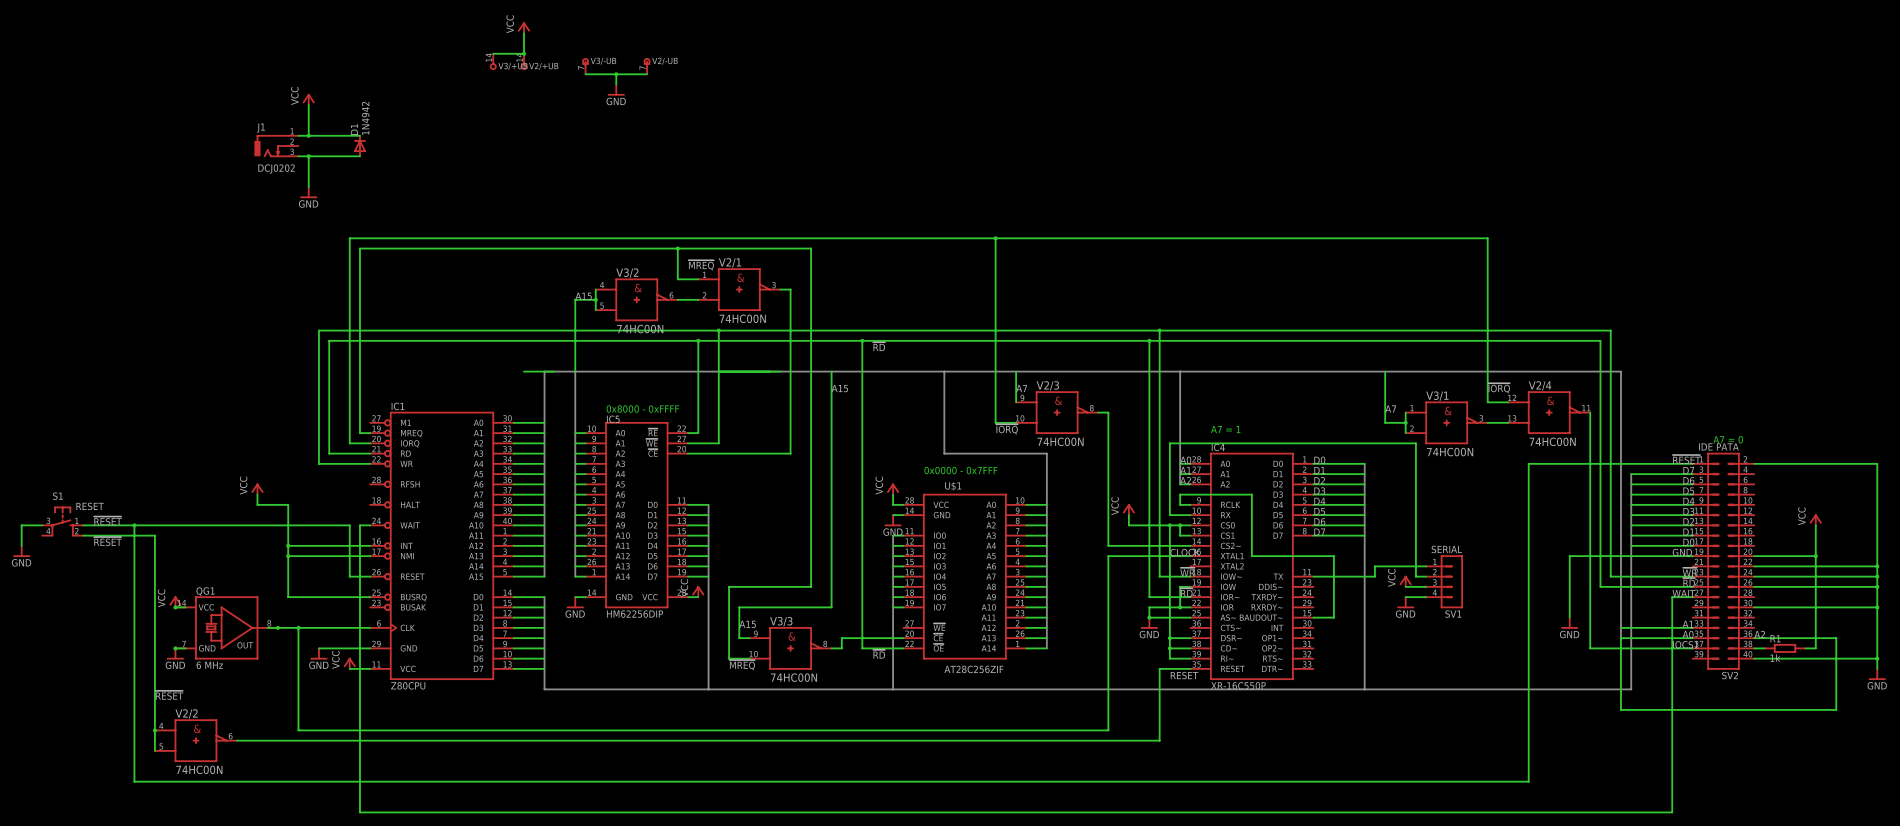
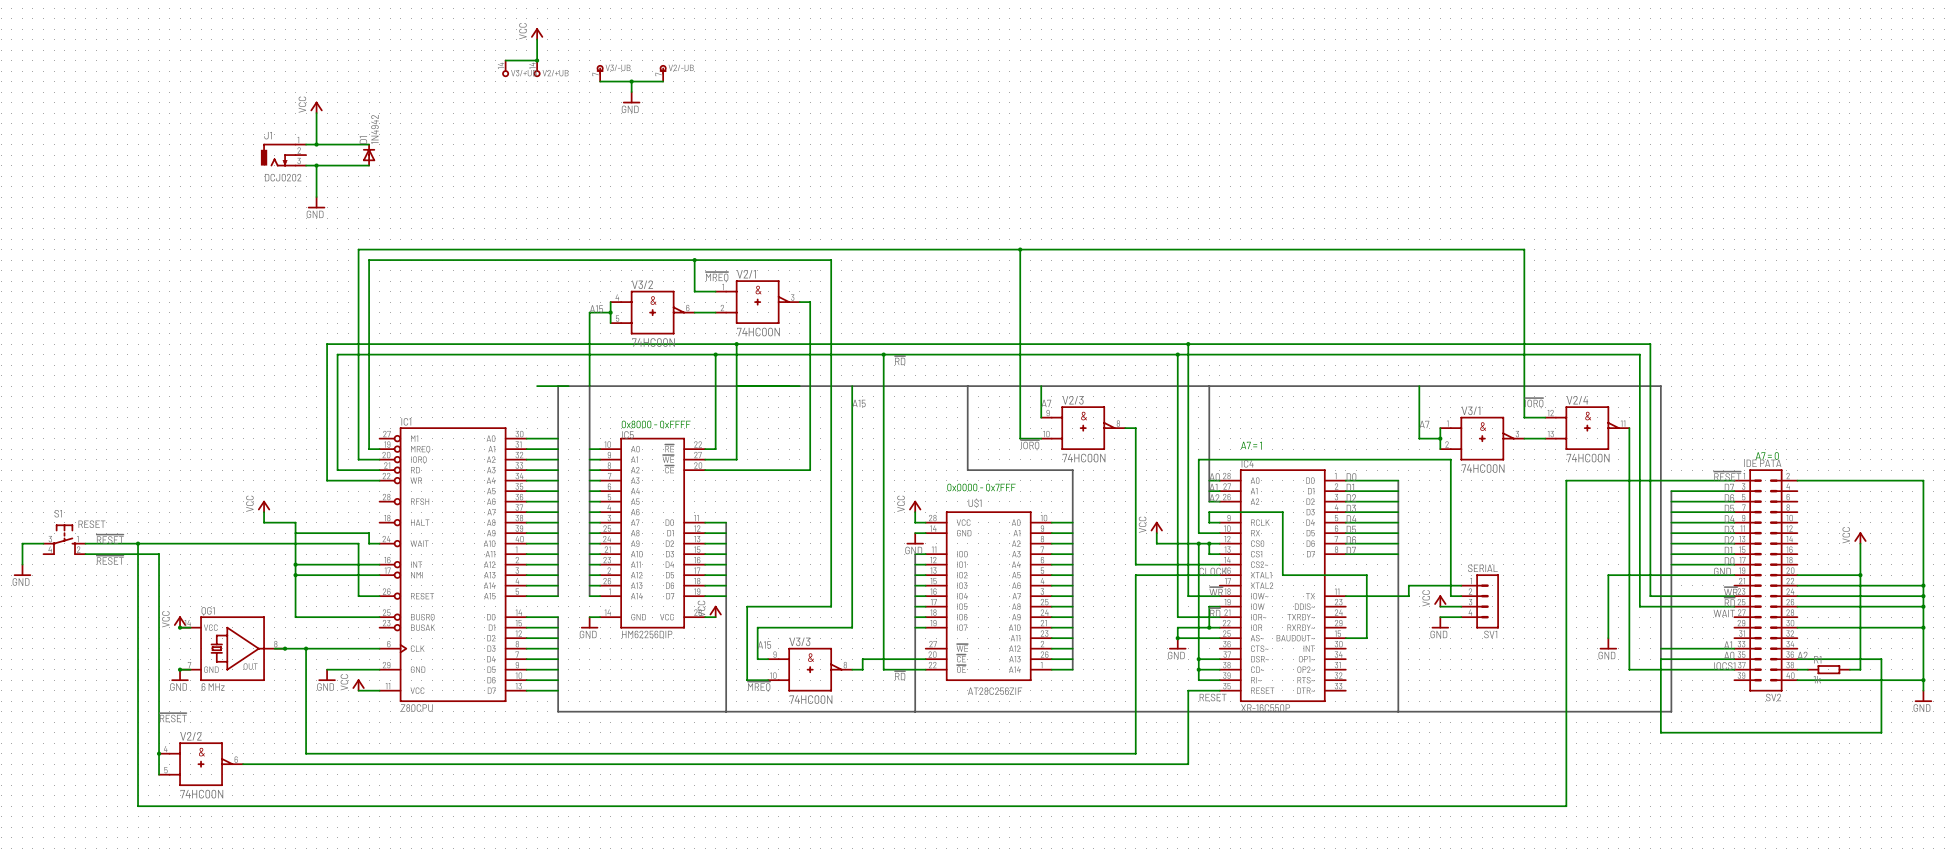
wire: (359, 525) (359, 812) (1672, 812) (1672, 597) (1692, 597) -> (369, 543) (369, 533) (295, 533)

